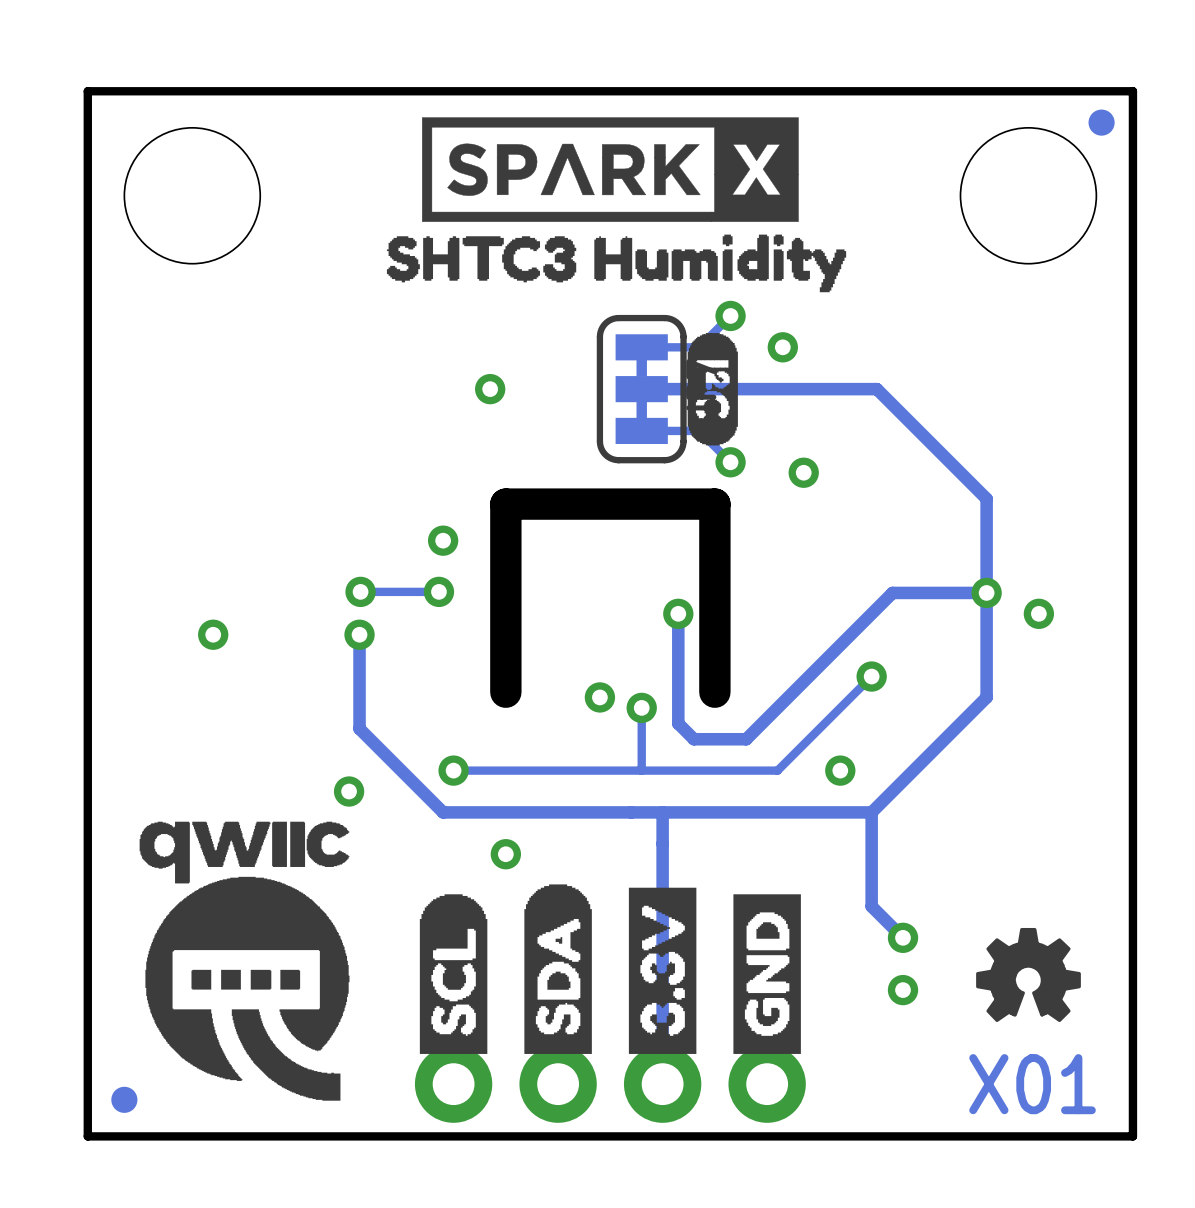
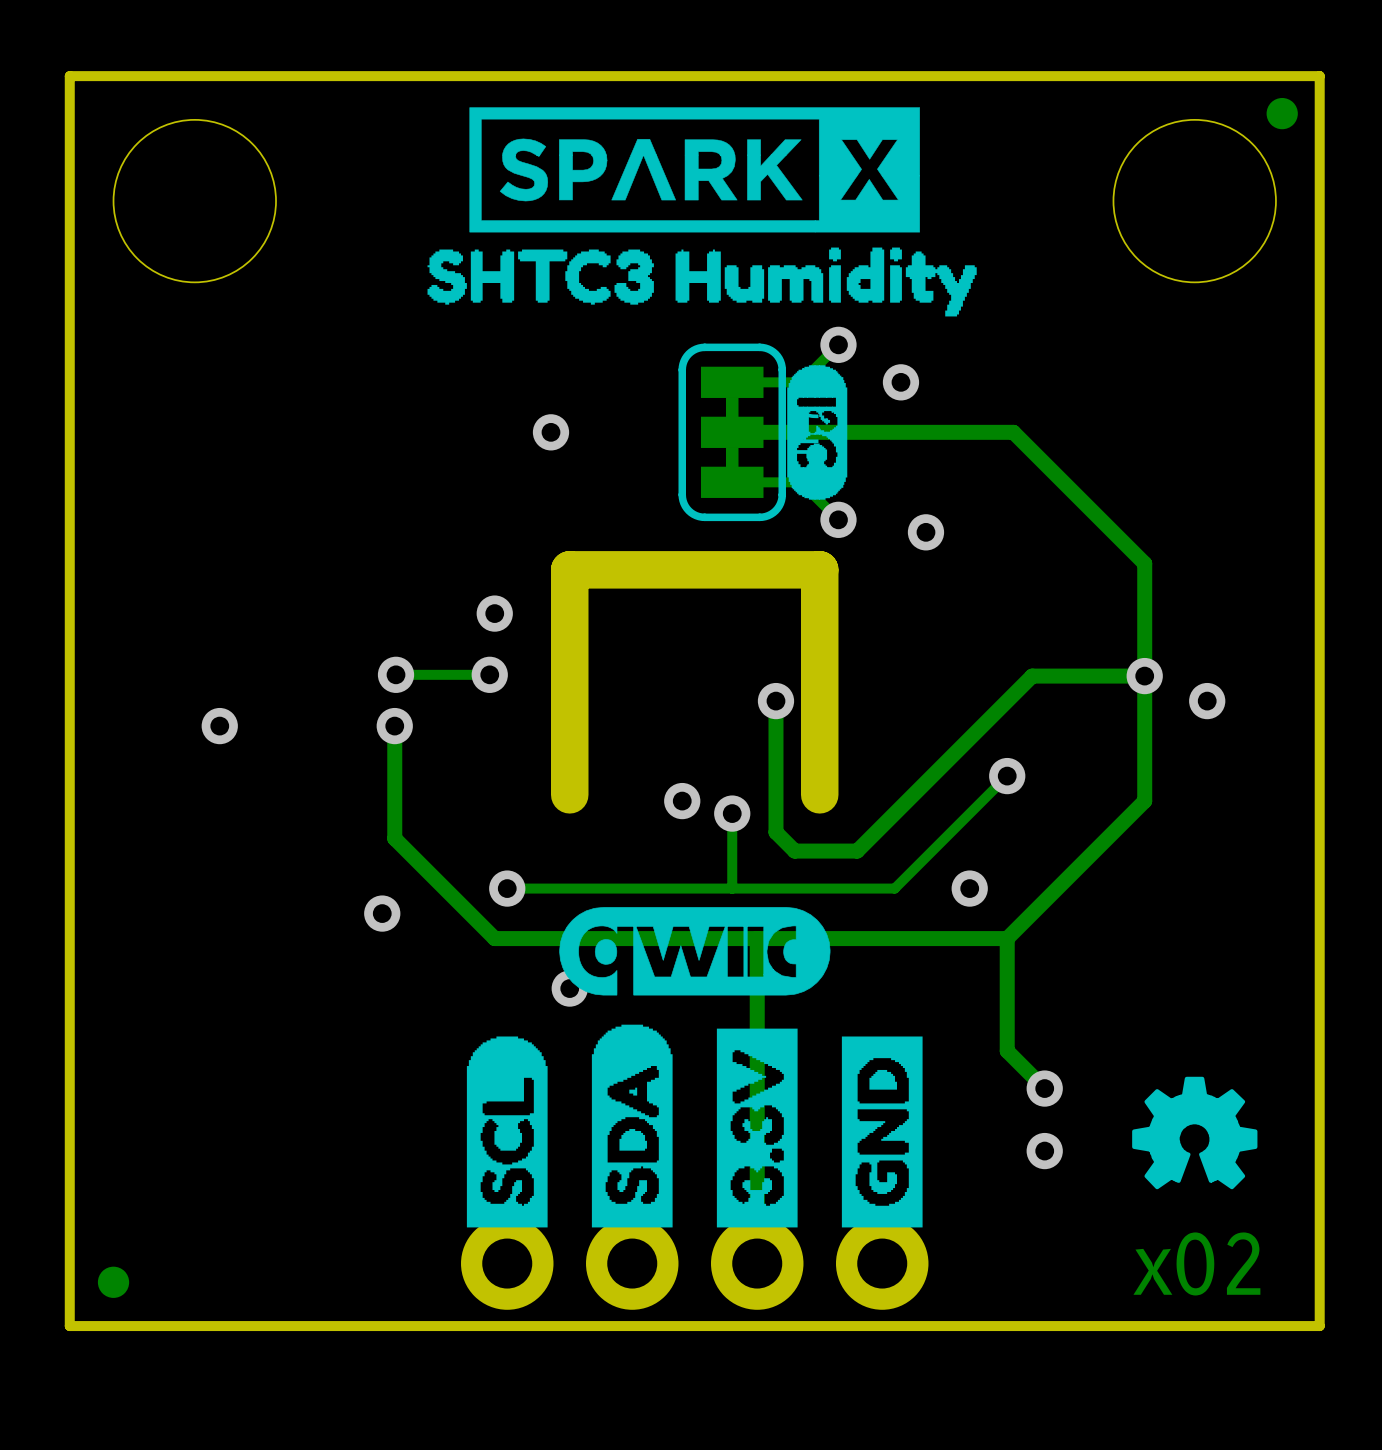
drawing: none -> [559, 907, 831, 996]
drawing: [139, 821, 350, 1101] -> none
text: X01 (1032, 1084) -> x02 (1196, 1263)

